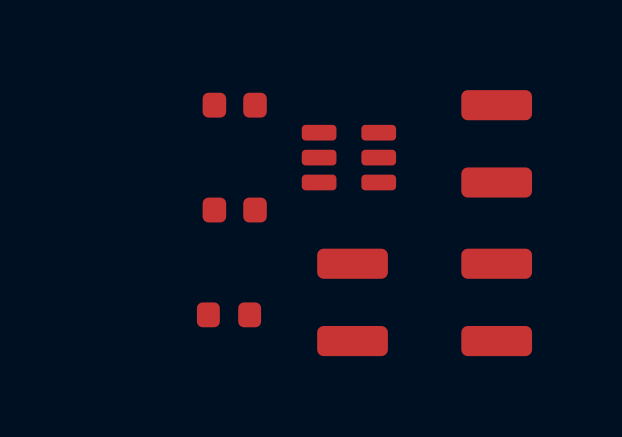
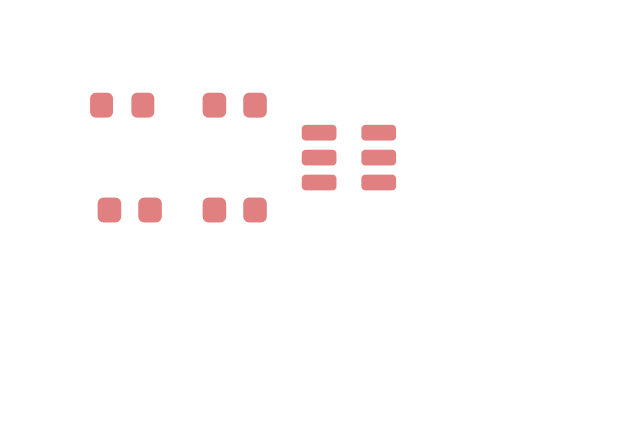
part: (496, 143) -> none
part: none -> (129, 210)
part: (352, 302) -> none
part: (496, 302) -> none
part position: (229, 314) -> (122, 105)

